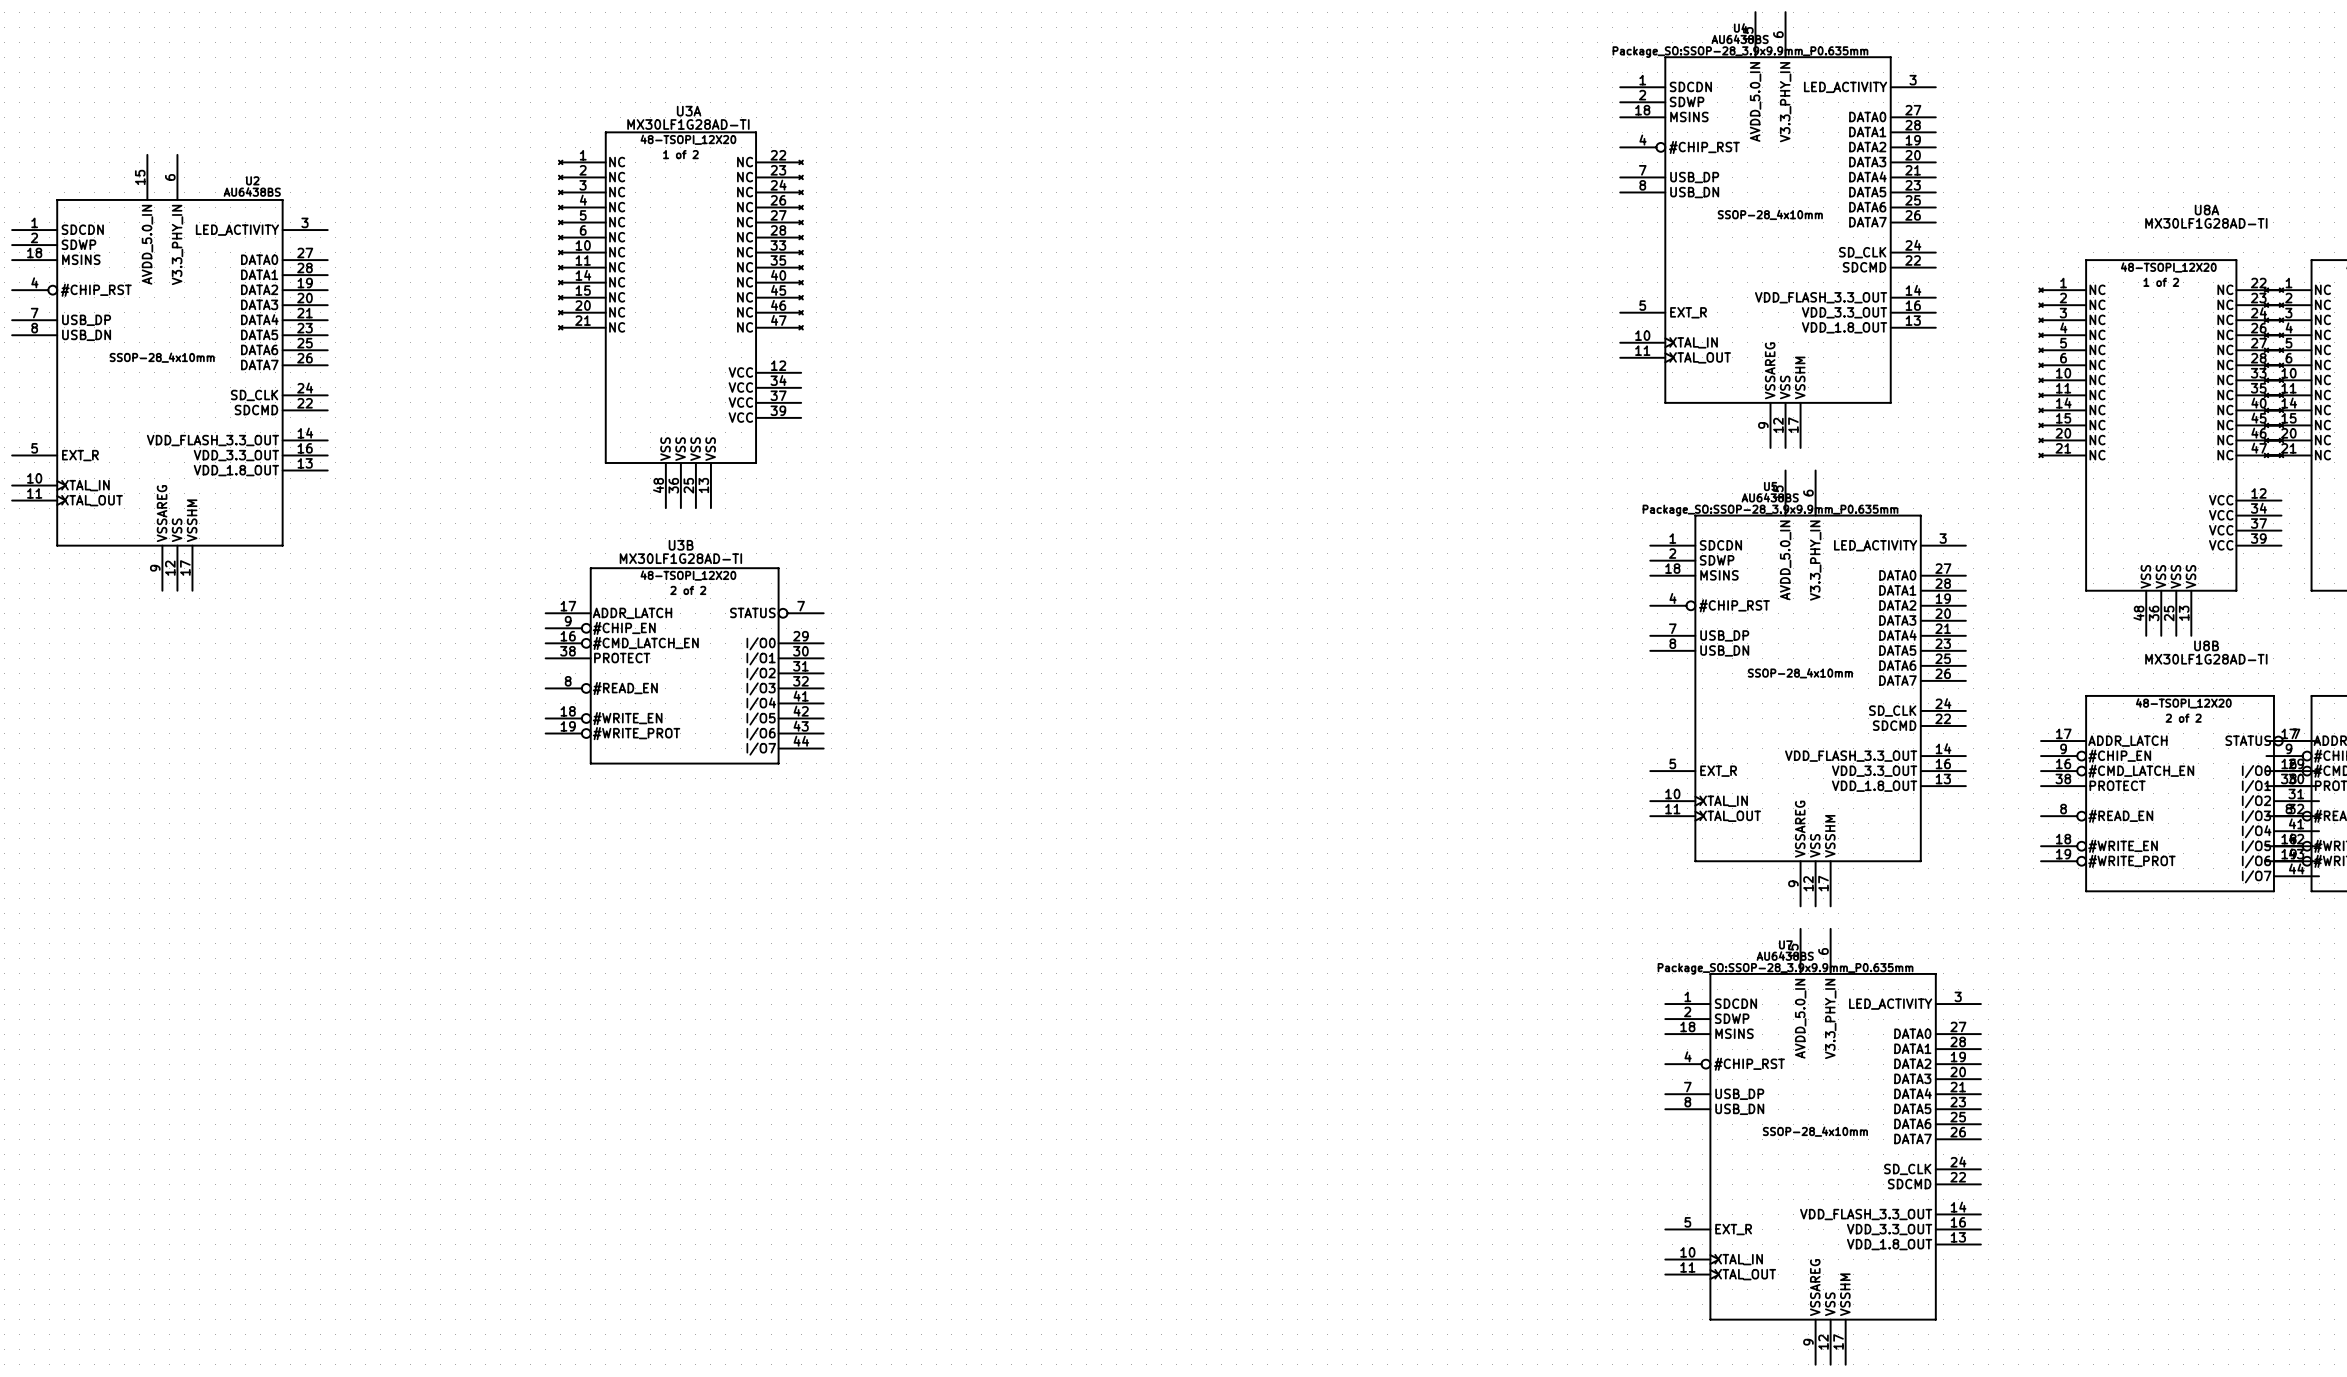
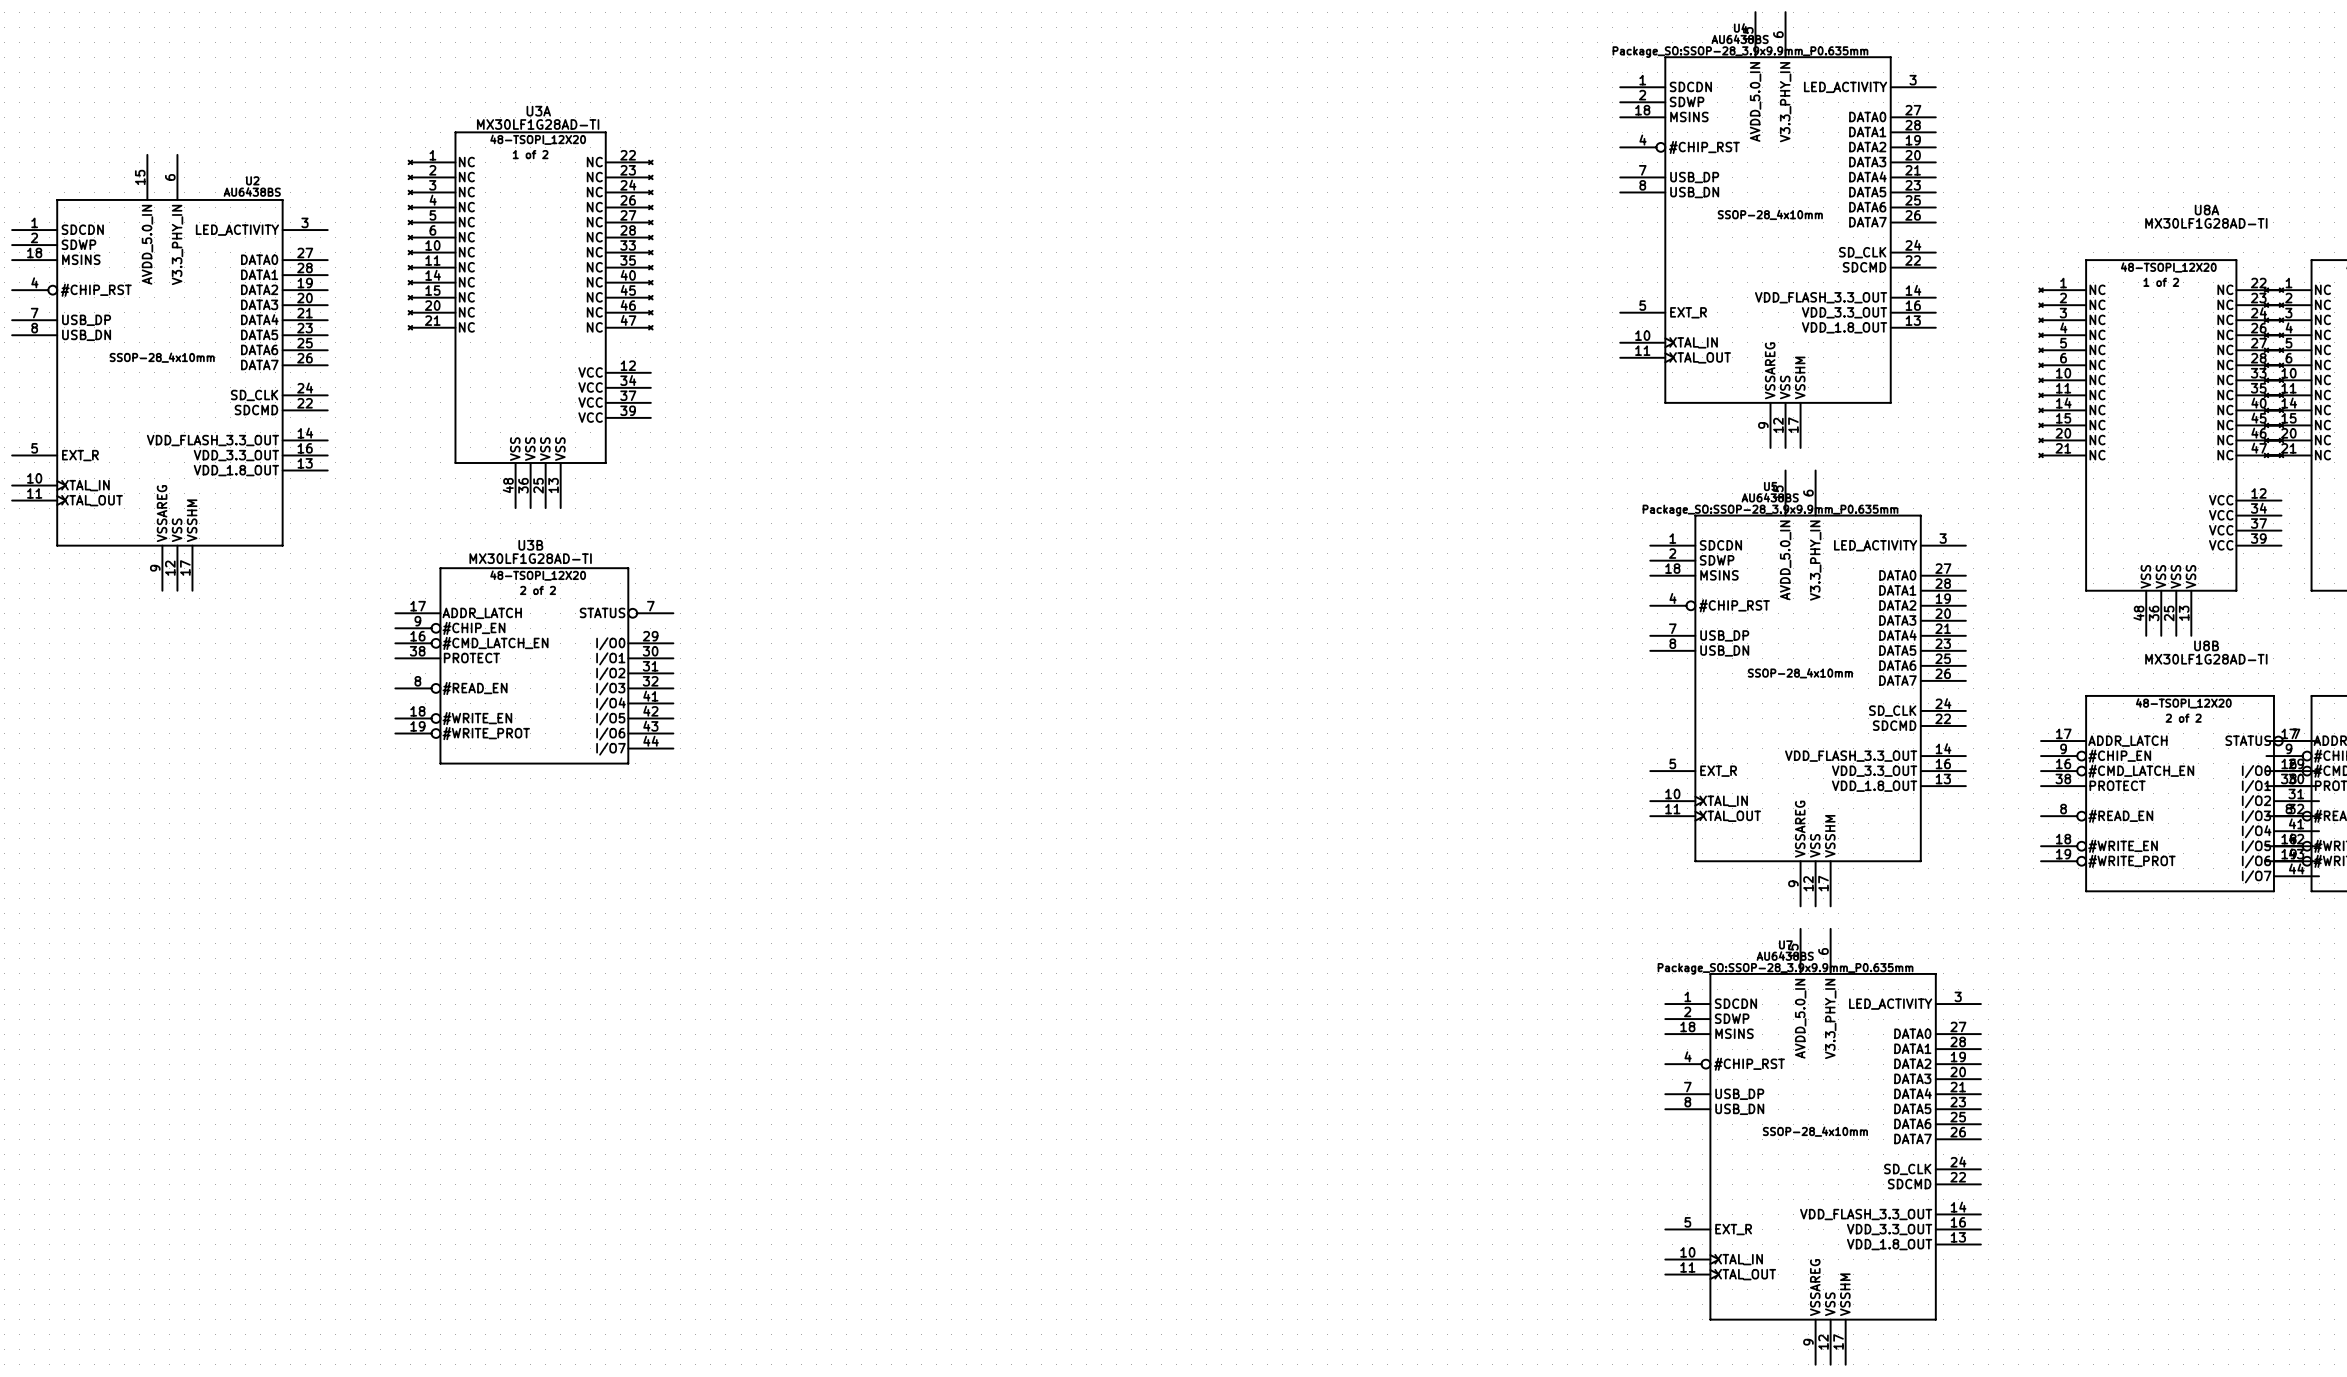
U3A position: (680, 320) -> (530, 320)
U3B position: (684, 665) -> (534, 665)

